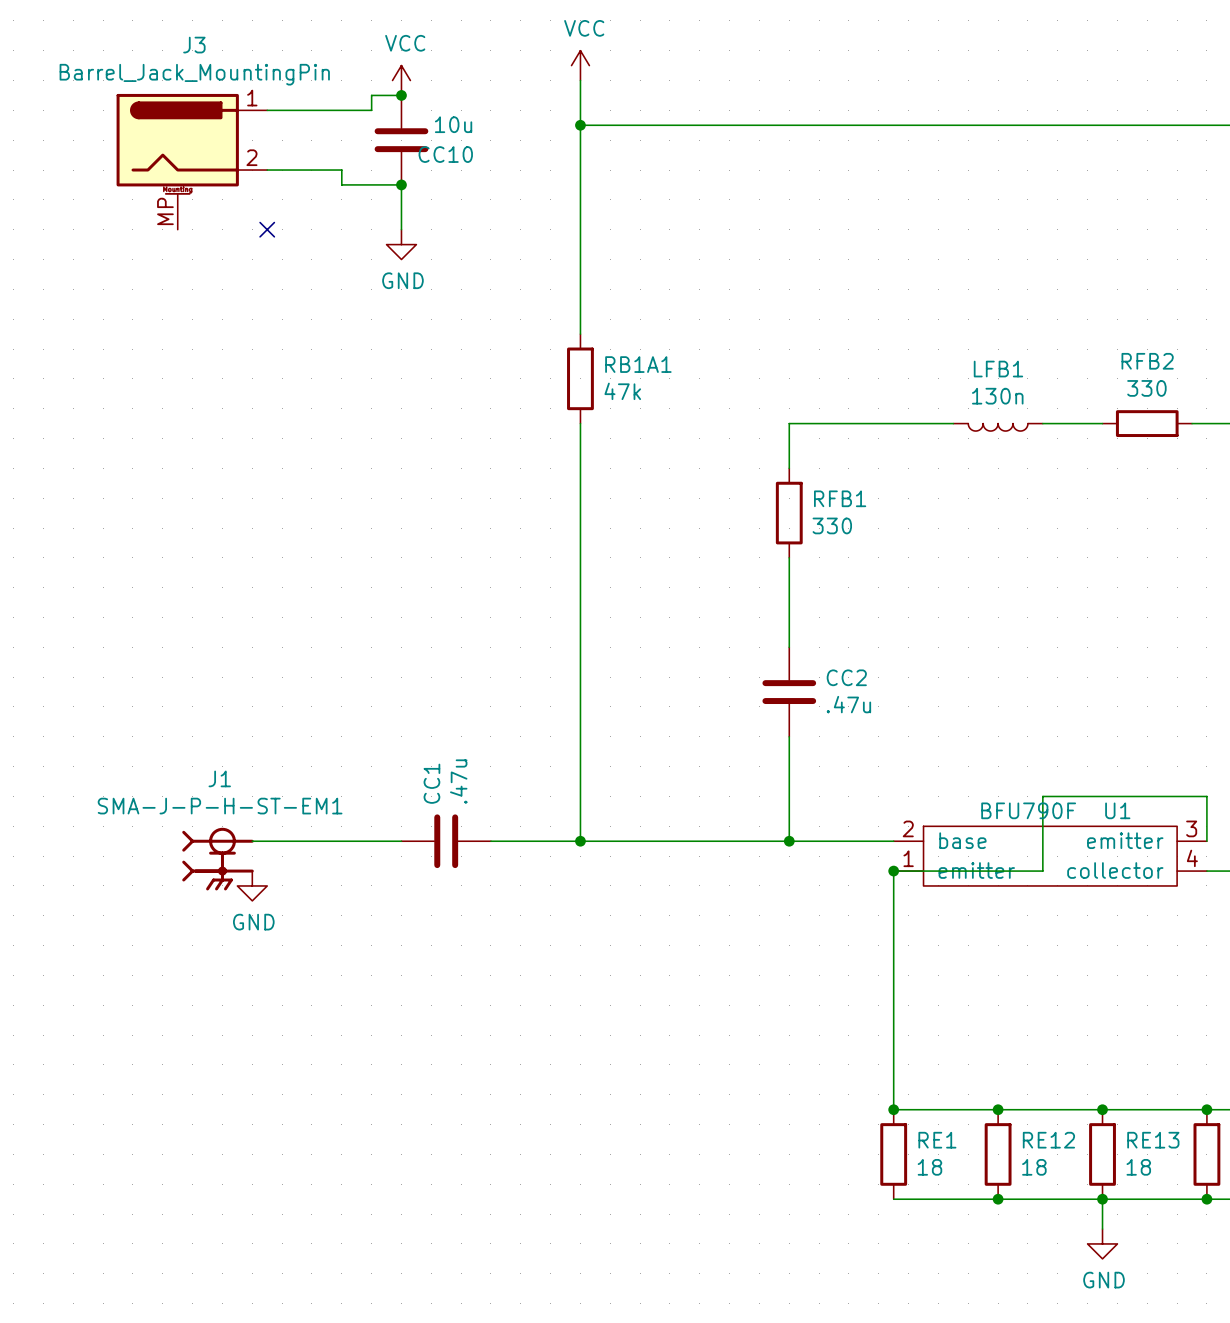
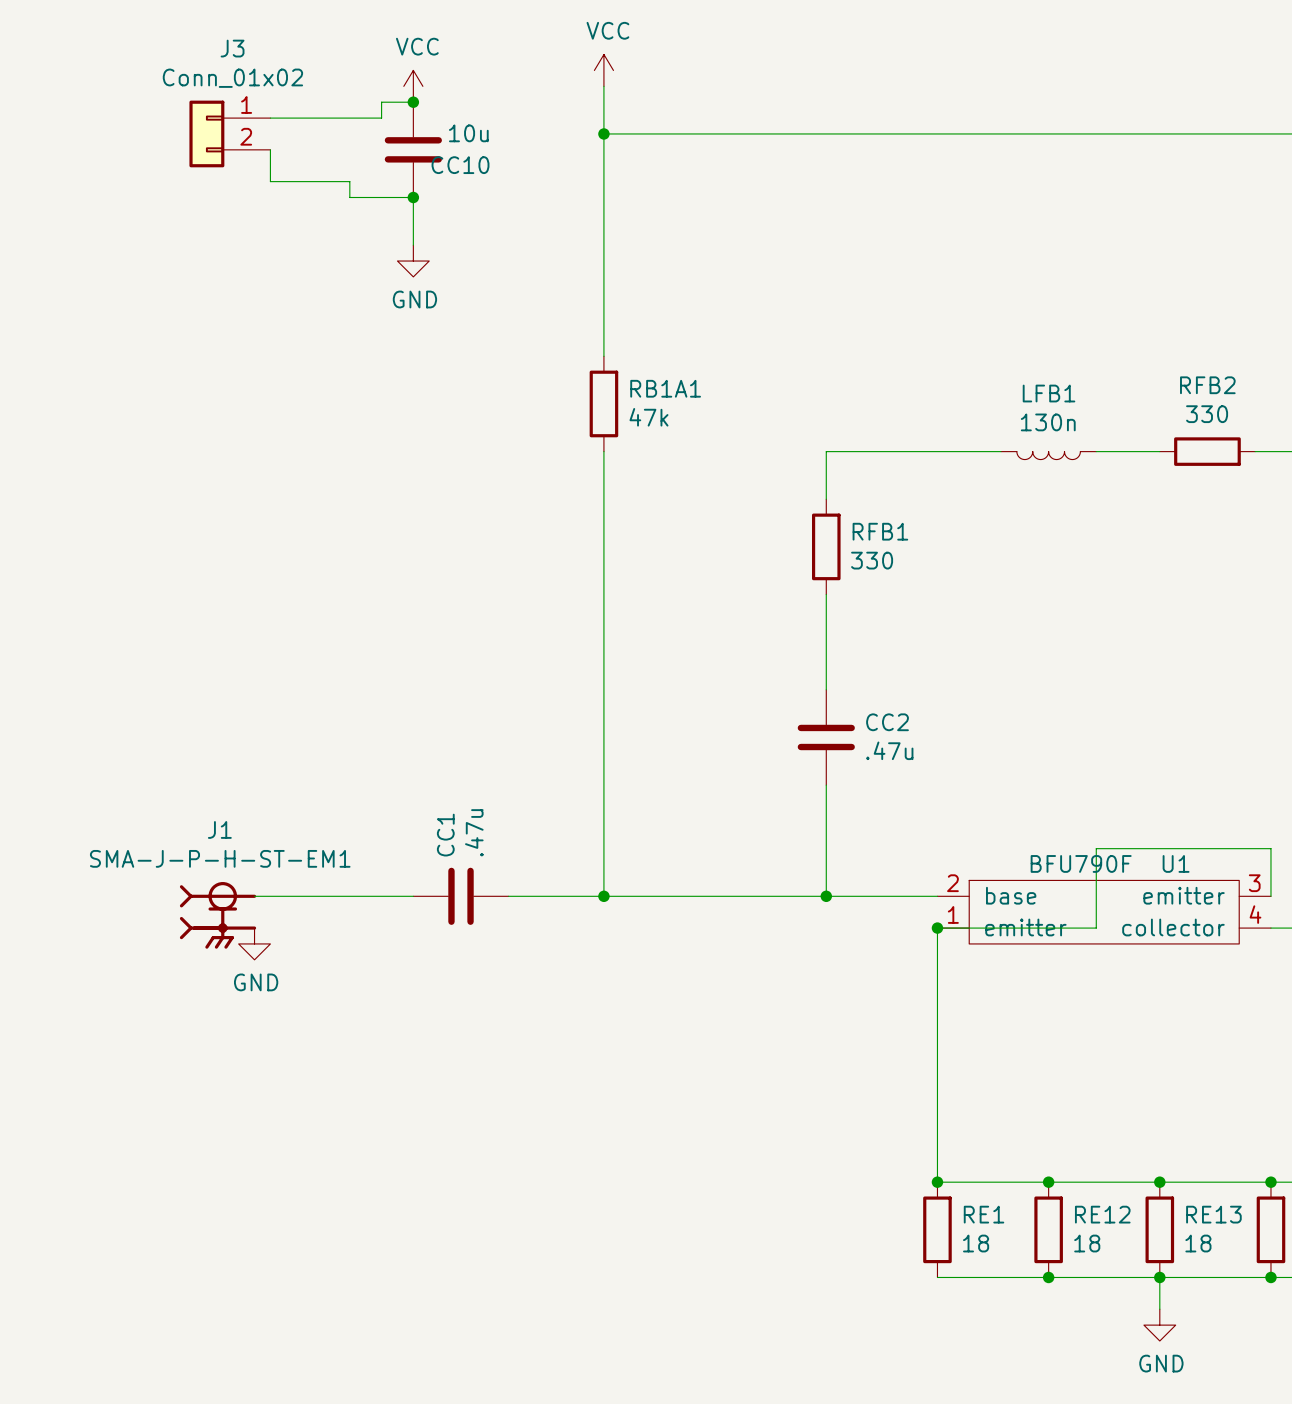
J3 name position: J3 (194, 45) -> J3 (232, 48)
J3 value: Barrel_Jack_MountingPin (194, 74) -> Conn_01x02 (232, 78)
J3 symbol: [116, 93, 268, 230] -> [189, 100, 271, 168]
wire: none -> (270, 149) (270, 181)
no-connect mark: (267, 229) -> none

